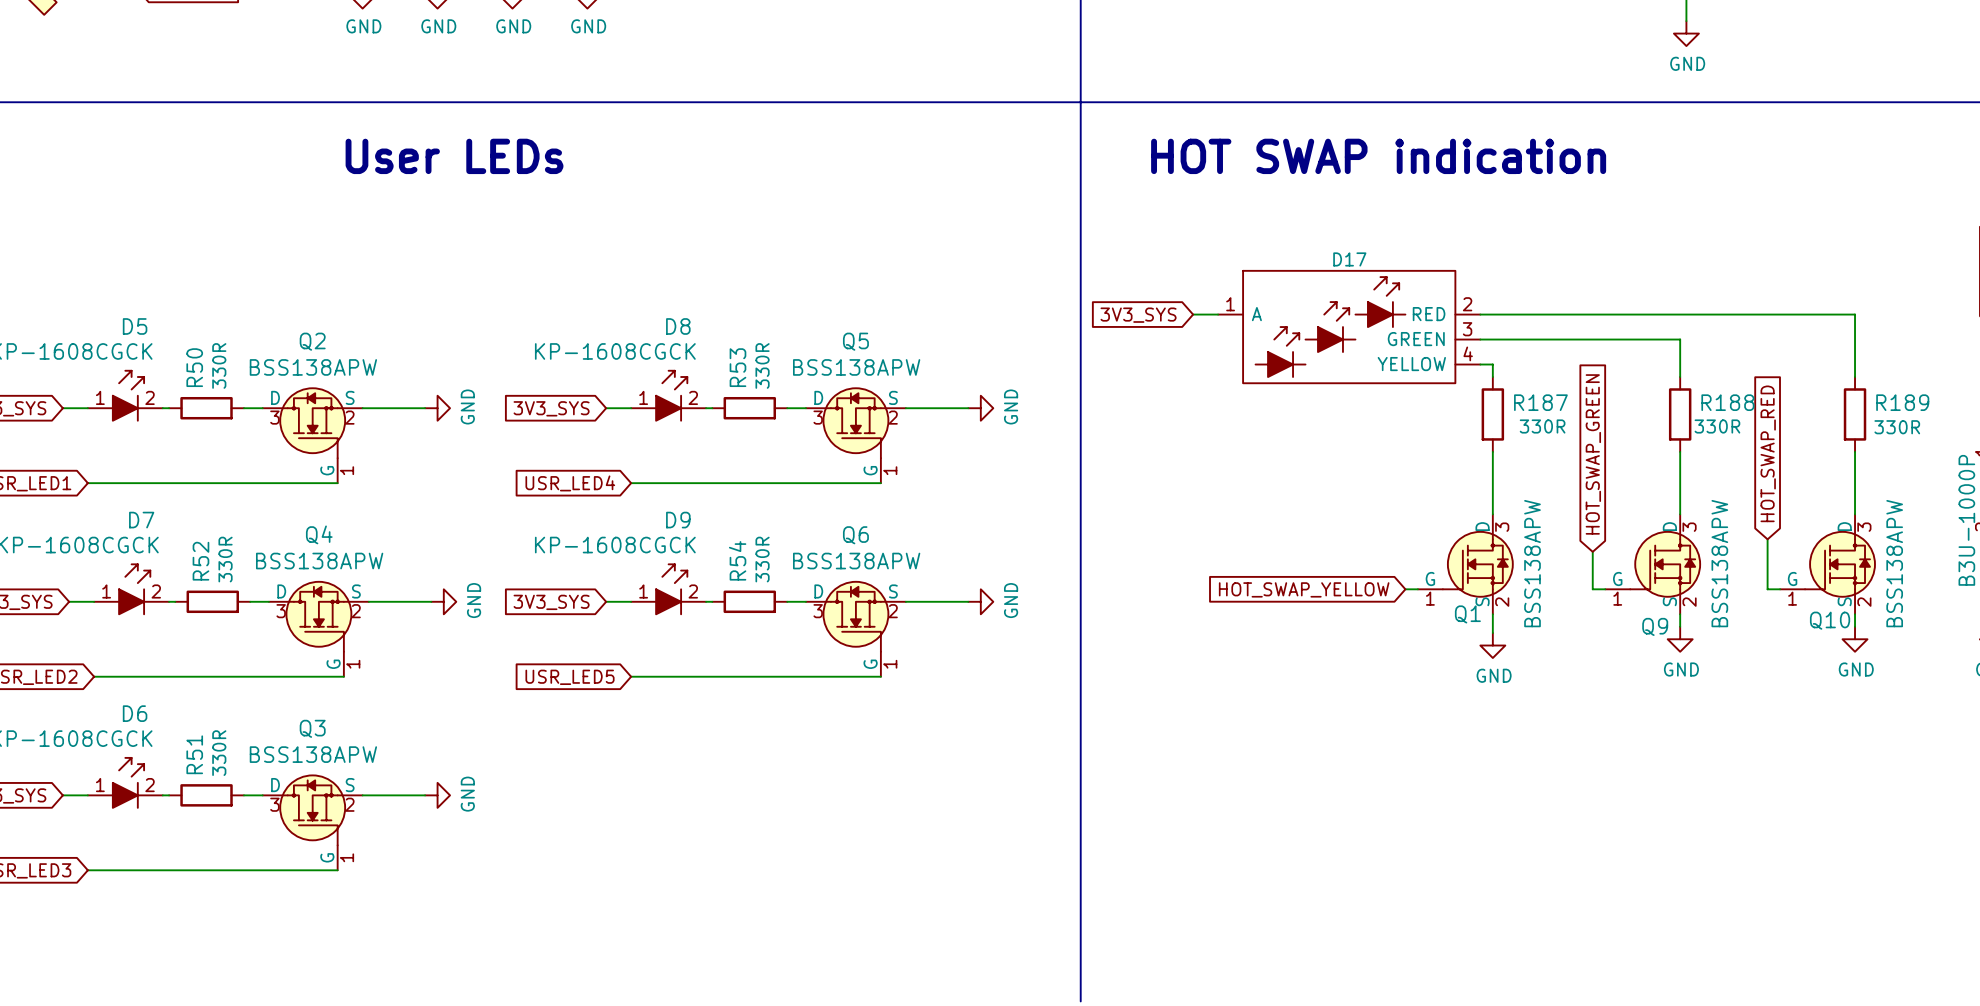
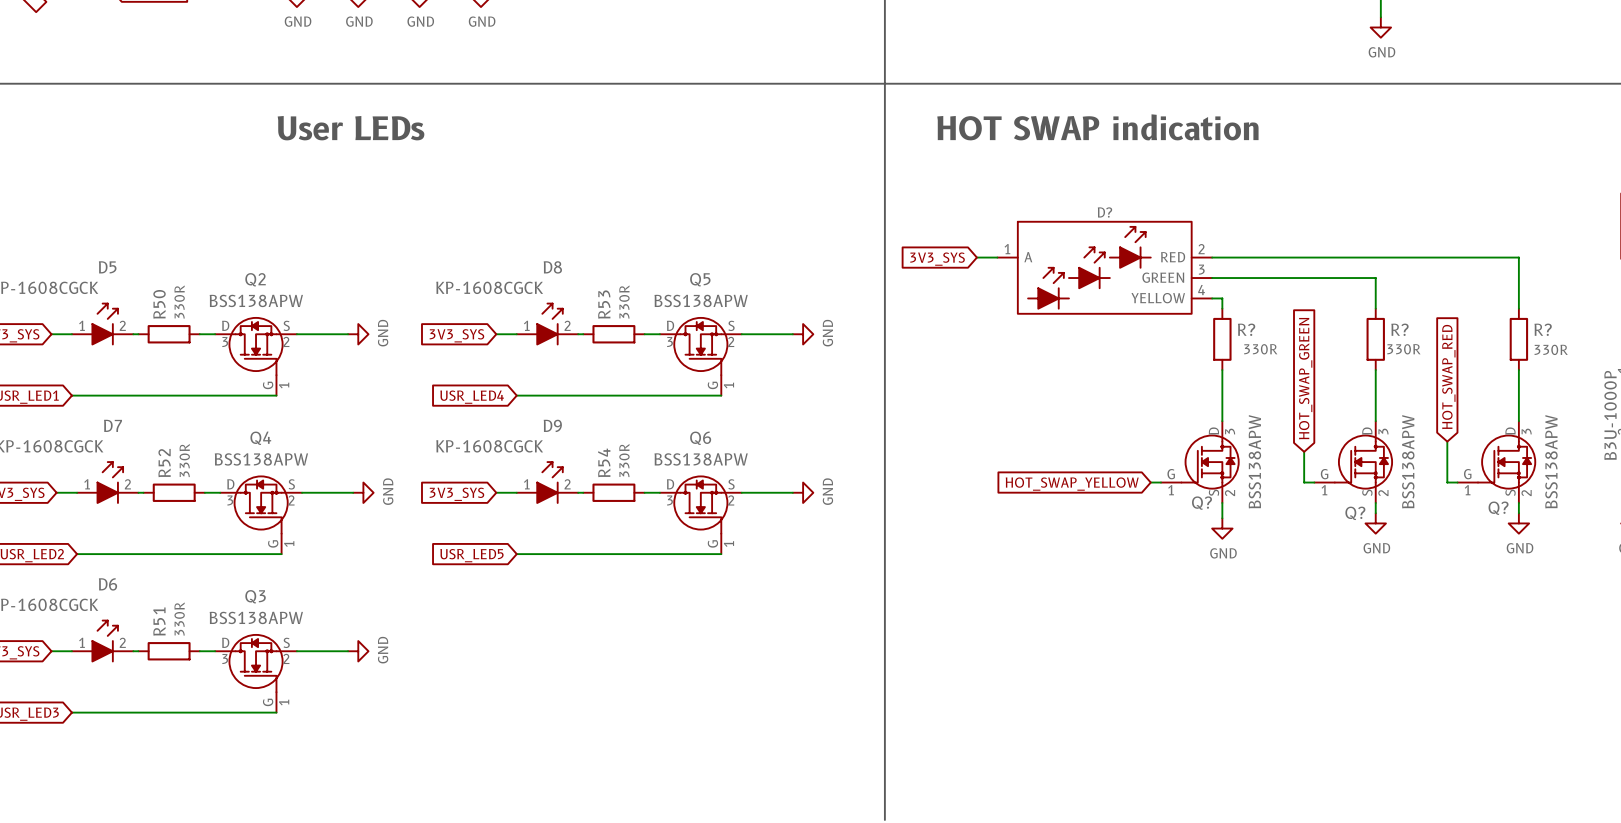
D17 name: D17 (1349, 259) -> D? (1104, 212)
R187 name: R187 (1540, 402) -> R? (1246, 329)
R188 name: R188 (1727, 402) -> R? (1399, 329)
R189 name: R189 (1902, 402) -> R? (1543, 329)
Q1 name: Q1 (1467, 614) -> Q? (1202, 503)
Q10 name: Q10 (1830, 620) -> Q? (1498, 508)
Q9 name: Q9 (1655, 626) -> Q? (1355, 513)

